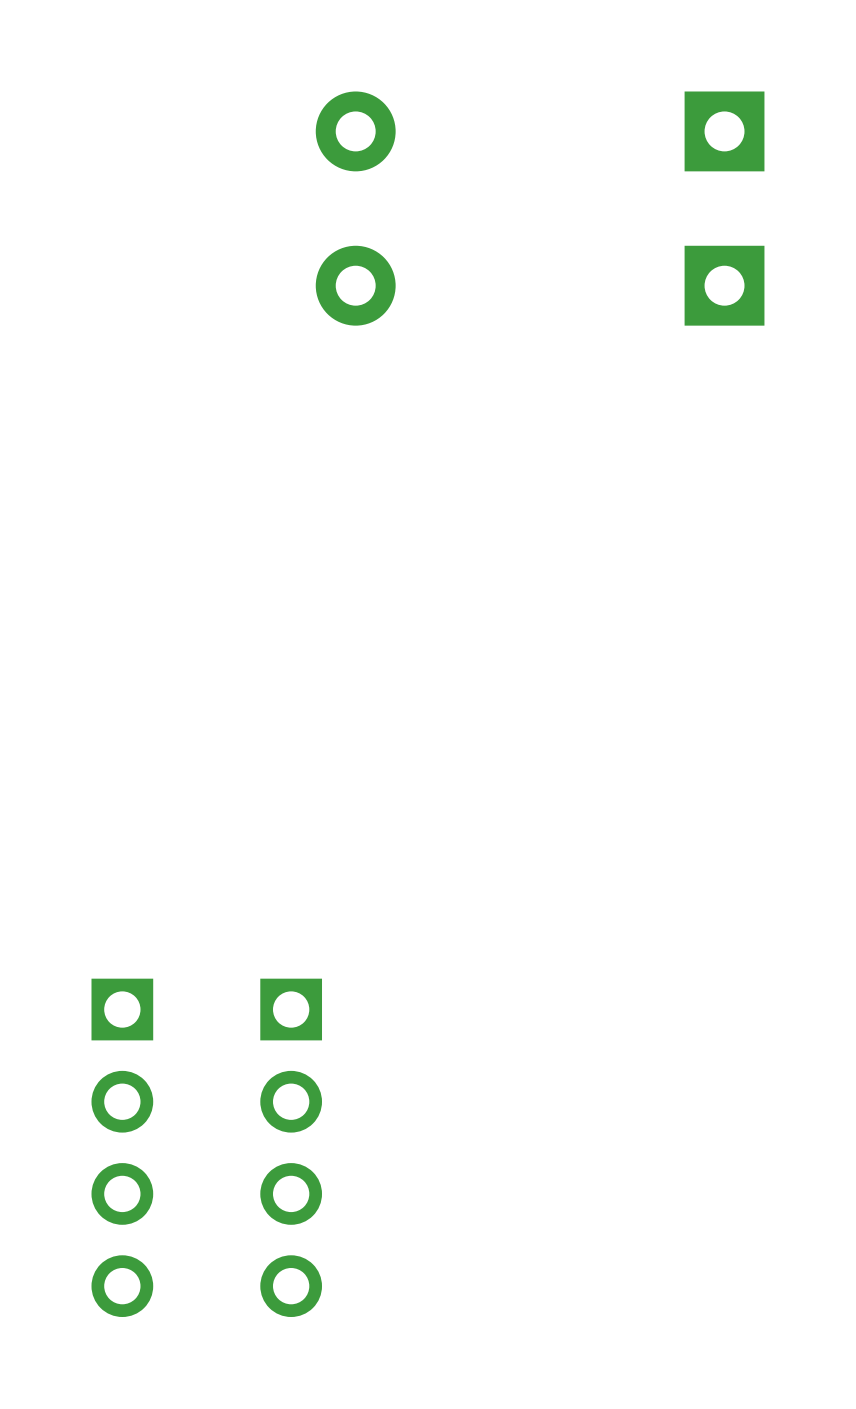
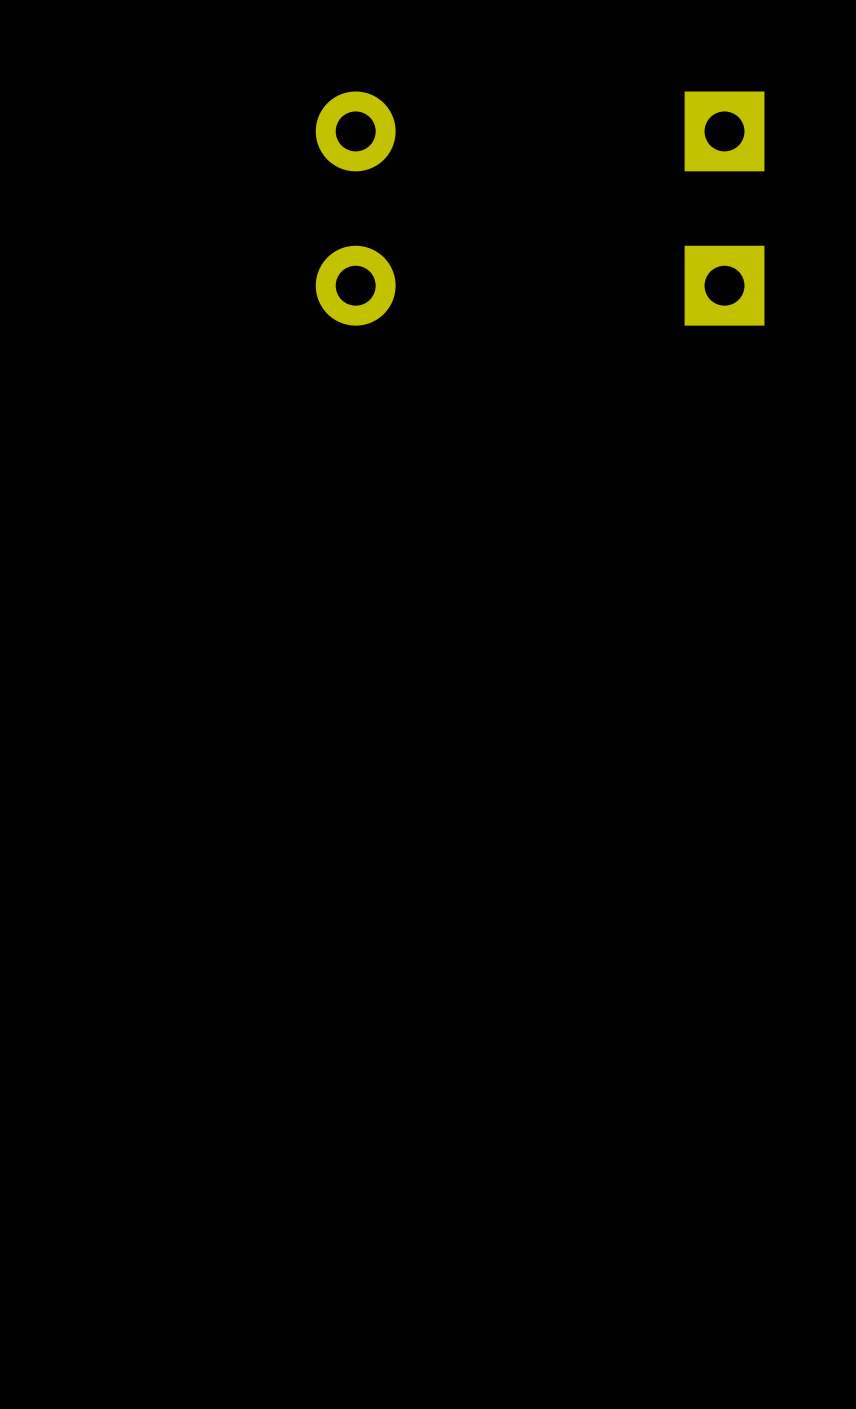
part: (122, 1147) -> none
part: (291, 1147) -> none

